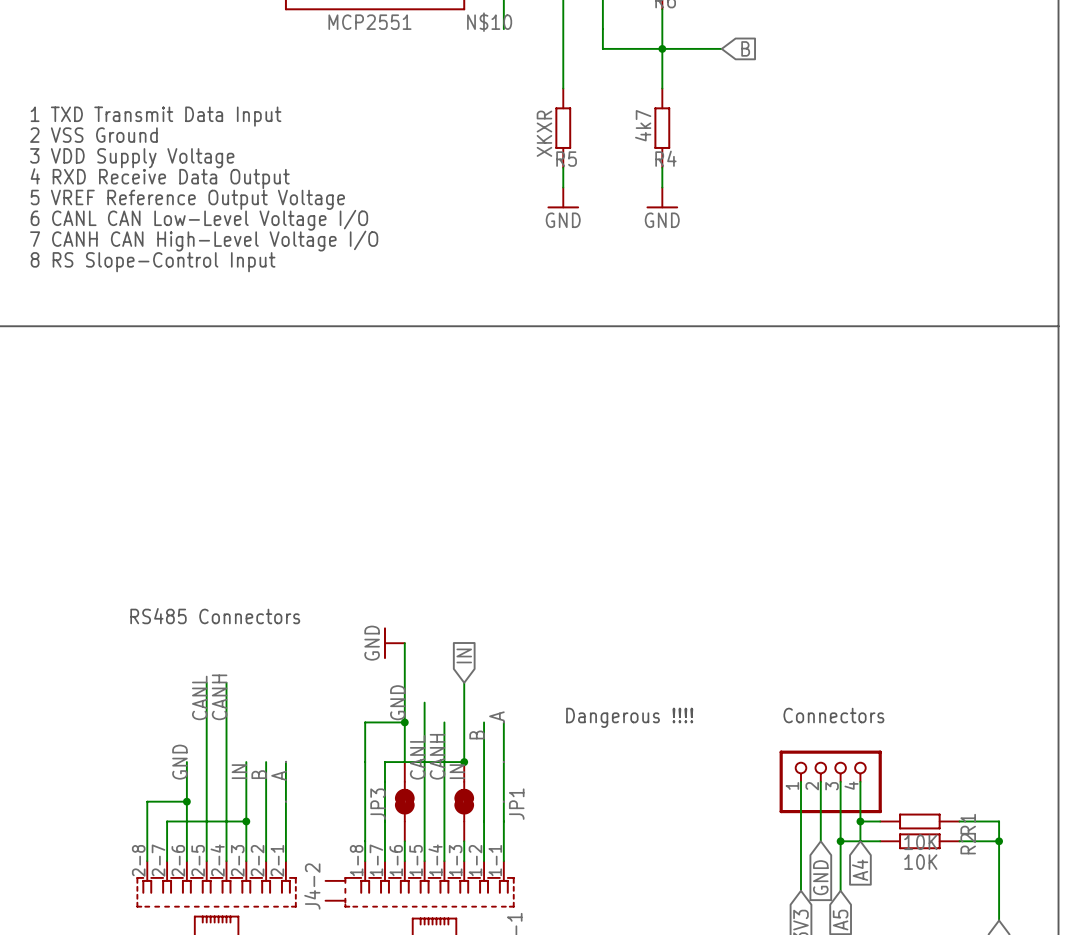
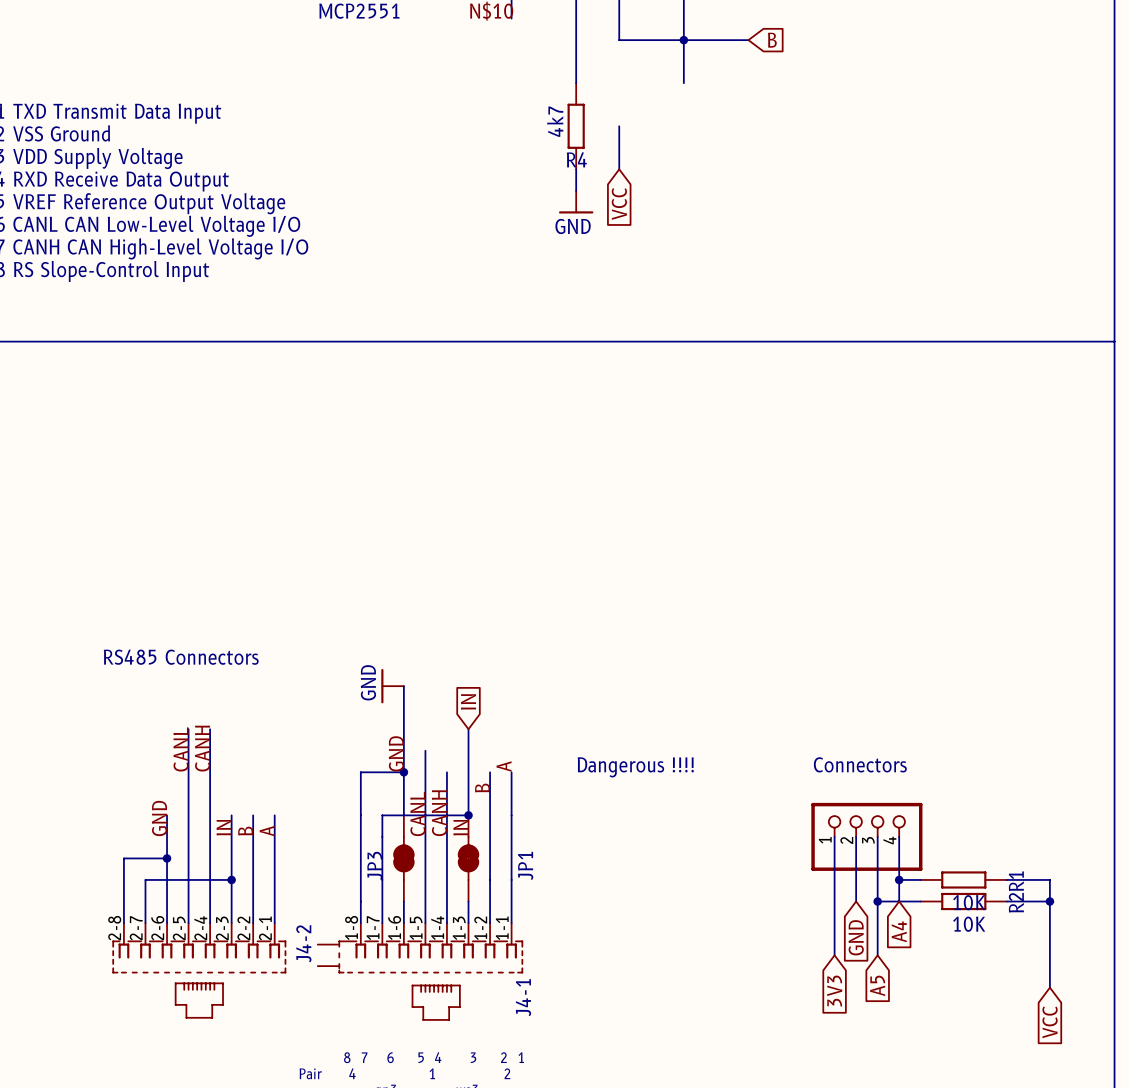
wire: none -> (619, 126) (619, 169)
R4: 4k7 (662, 128) -> none
R5 value: XKXR (544, 133) -> 4k7 (555, 121)
R5 name: R5 (566, 159) -> R4 (576, 159)
wire: (662, 167) (662, 187) -> none
power symbol: GND (662, 197) -> none
global label: none -> VCC (619, 203)

